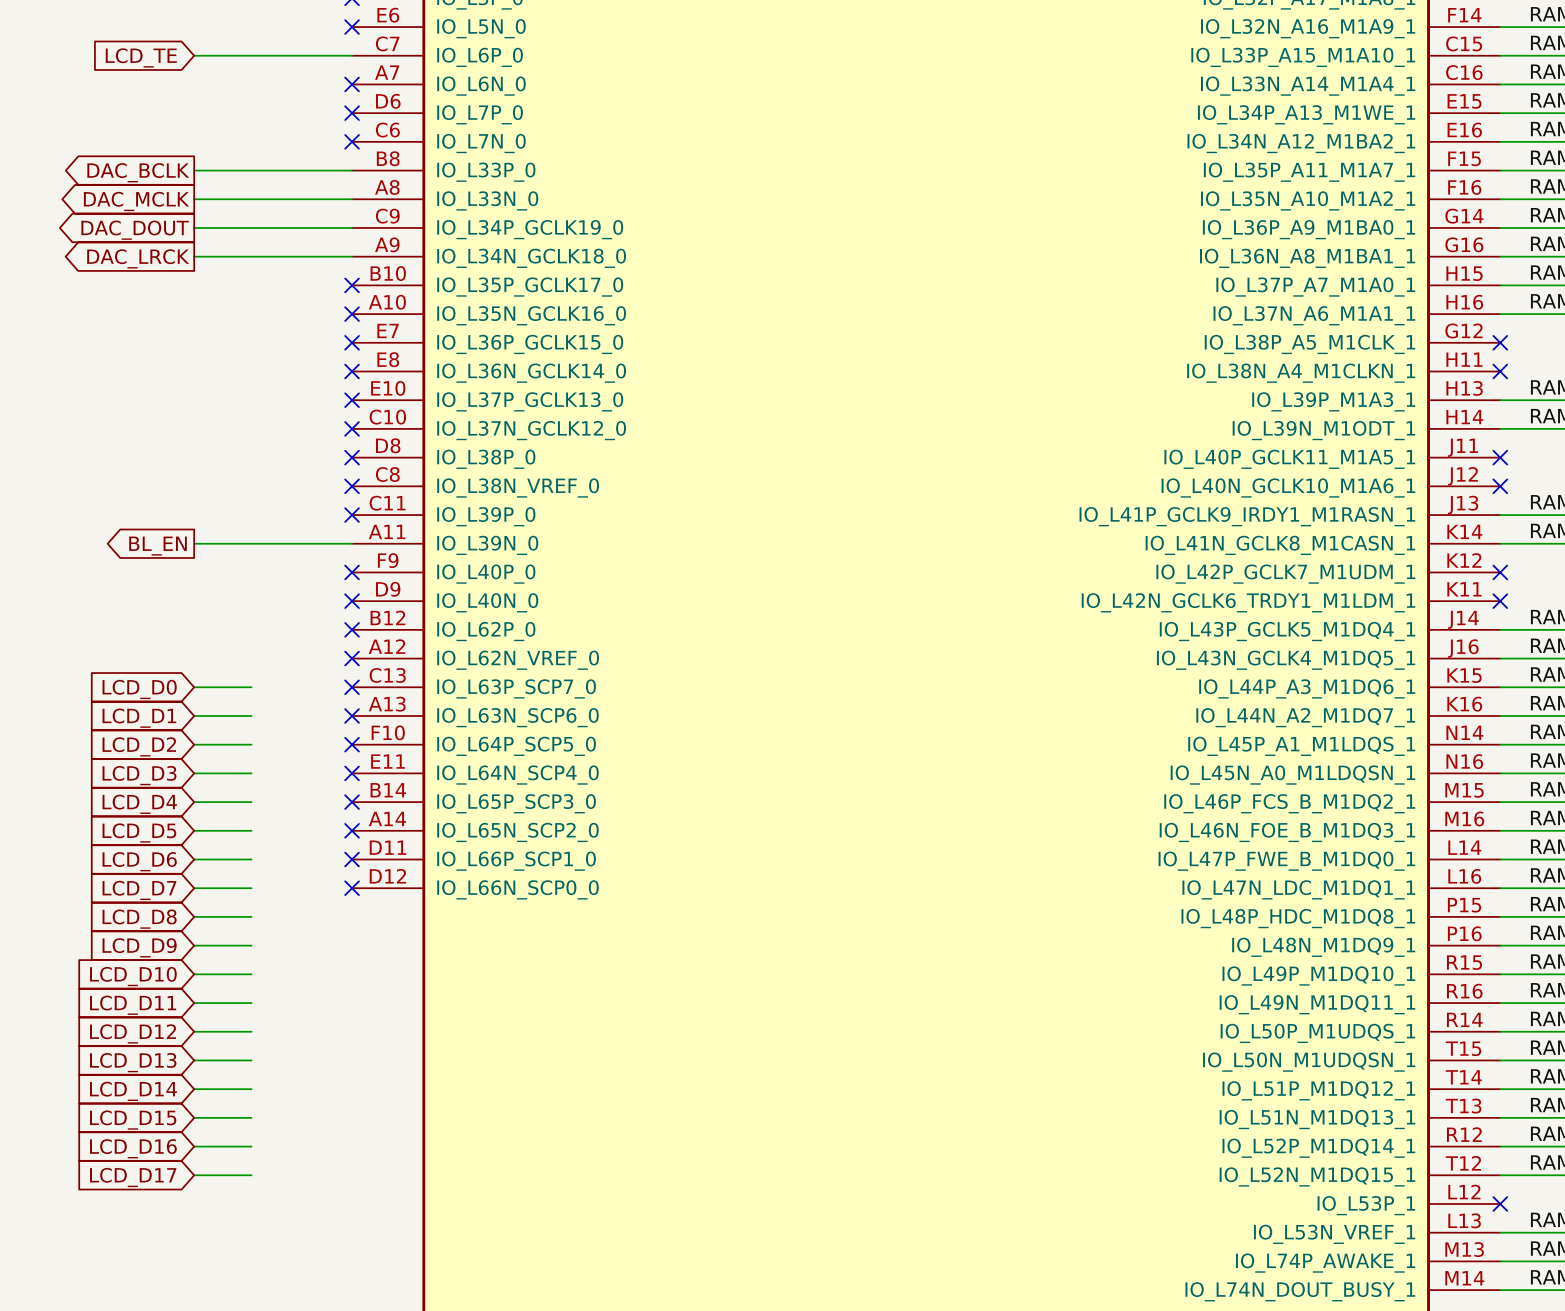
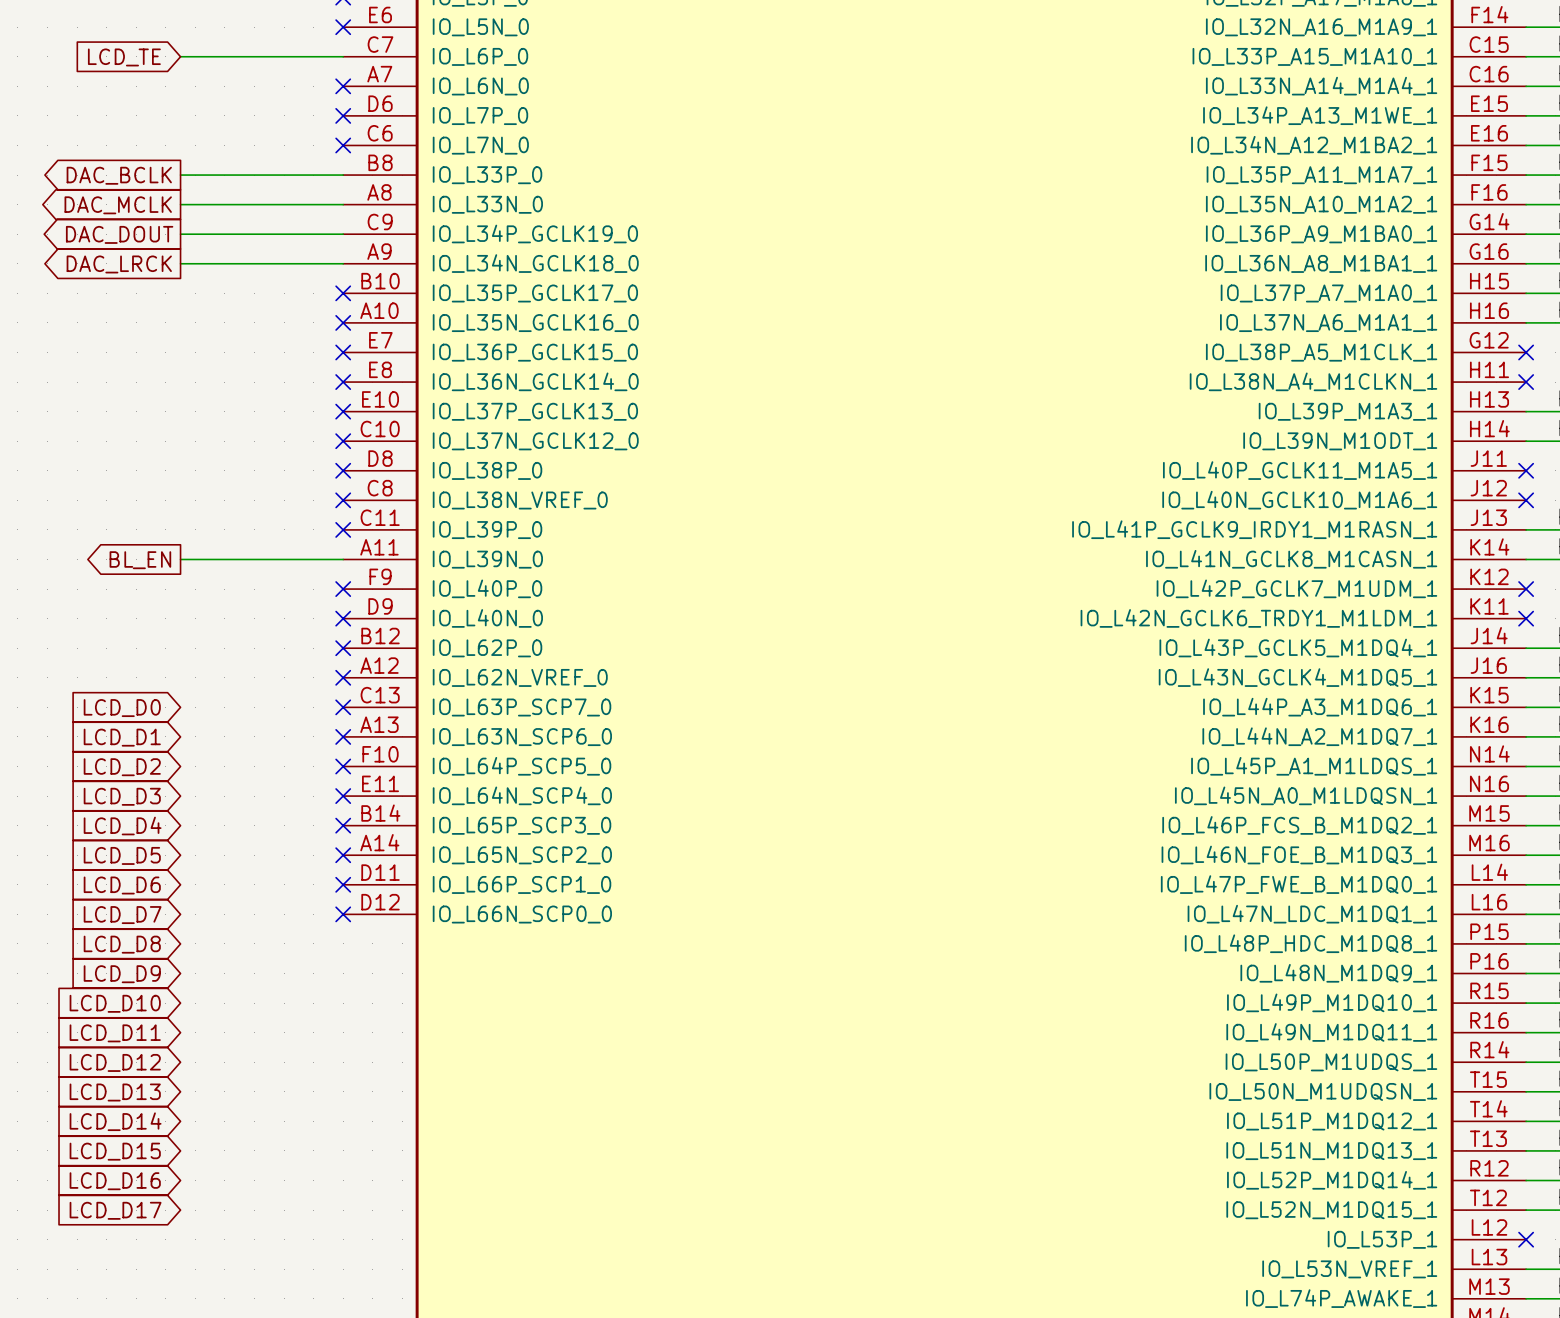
wire: (194, 687) (251, 687) -> none
wire: (194, 715) (251, 715) -> none
wire: (194, 744) (251, 744) -> none
wire: (194, 773) (251, 773) -> none
wire: (194, 802) (251, 802) -> none
wire: (194, 830) (251, 830) -> none
wire: (194, 859) (251, 859) -> none
wire: (194, 888) (251, 888) -> none
wire: (194, 916) (251, 916) -> none
wire: (194, 945) (251, 945) -> none
wire: (194, 974) (251, 974) -> none
wire: (194, 1003) (251, 1003) -> none
wire: (194, 1031) (251, 1031) -> none
wire: (194, 1060) (251, 1060) -> none
wire: (194, 1089) (251, 1089) -> none
wire: (194, 1117) (251, 1117) -> none
wire: (194, 1146) (251, 1146) -> none
wire: (194, 1175) (251, 1175) -> none

